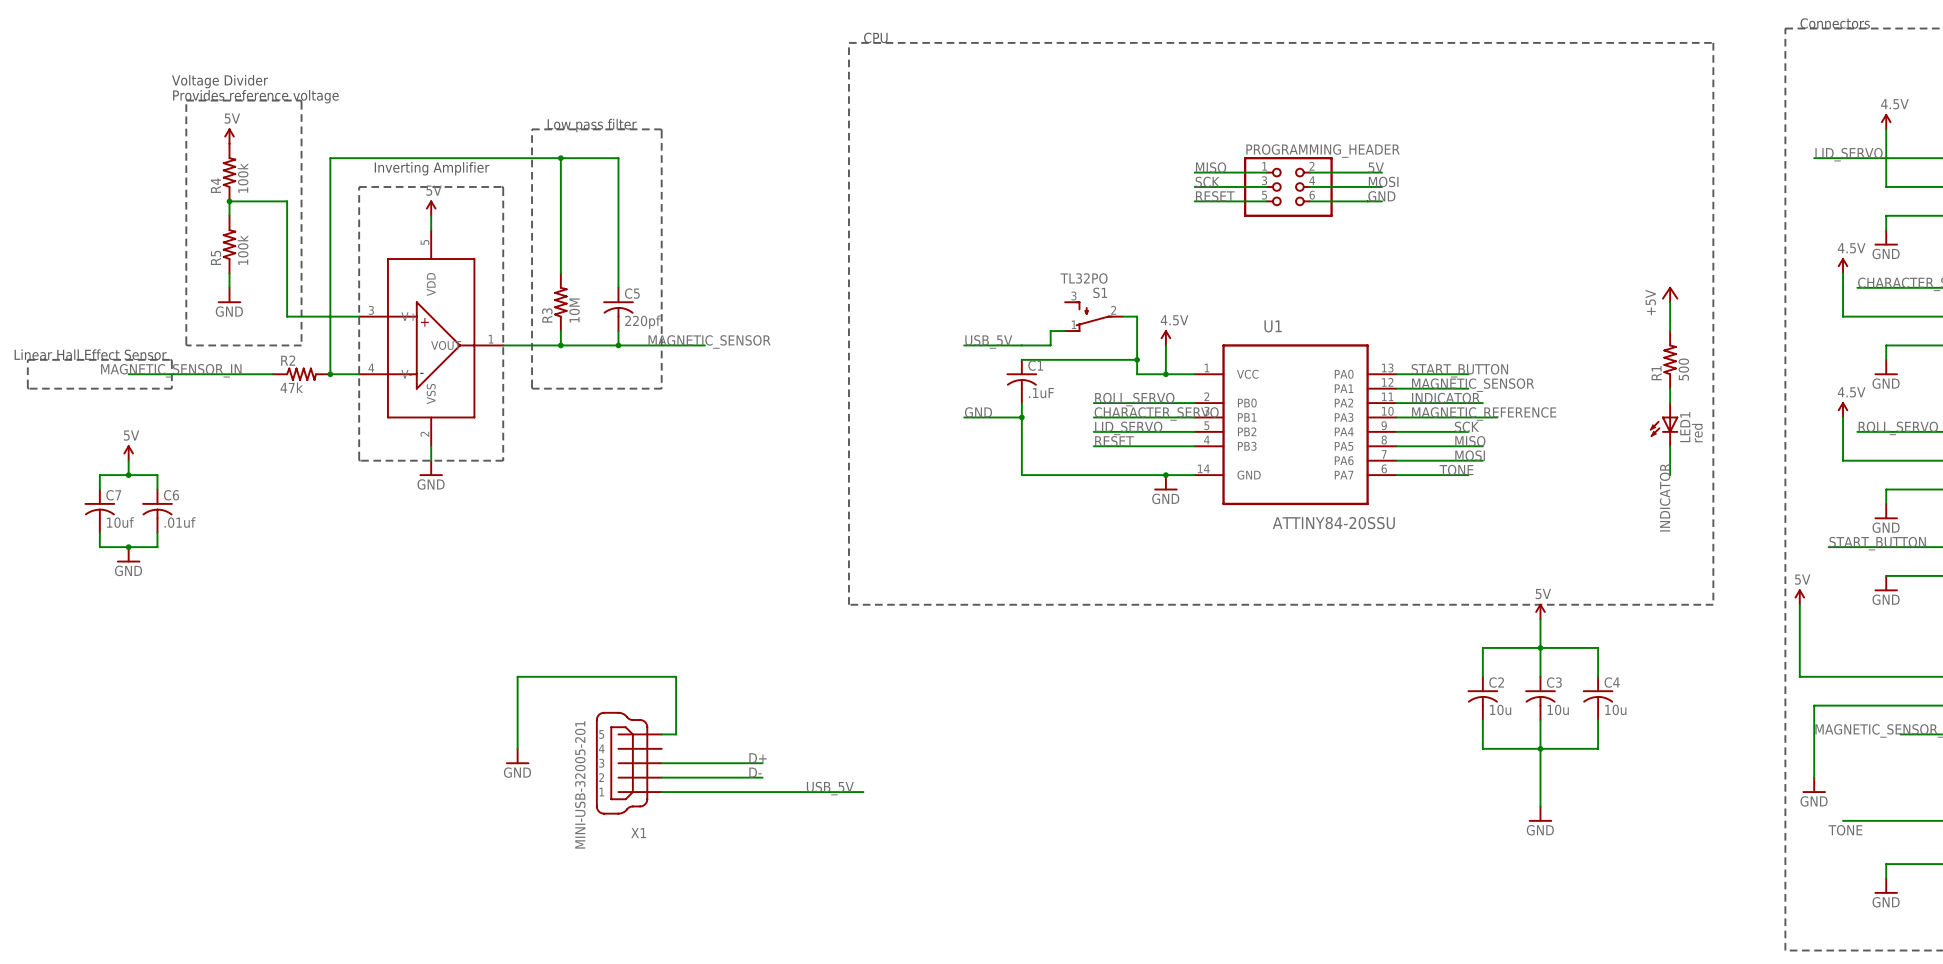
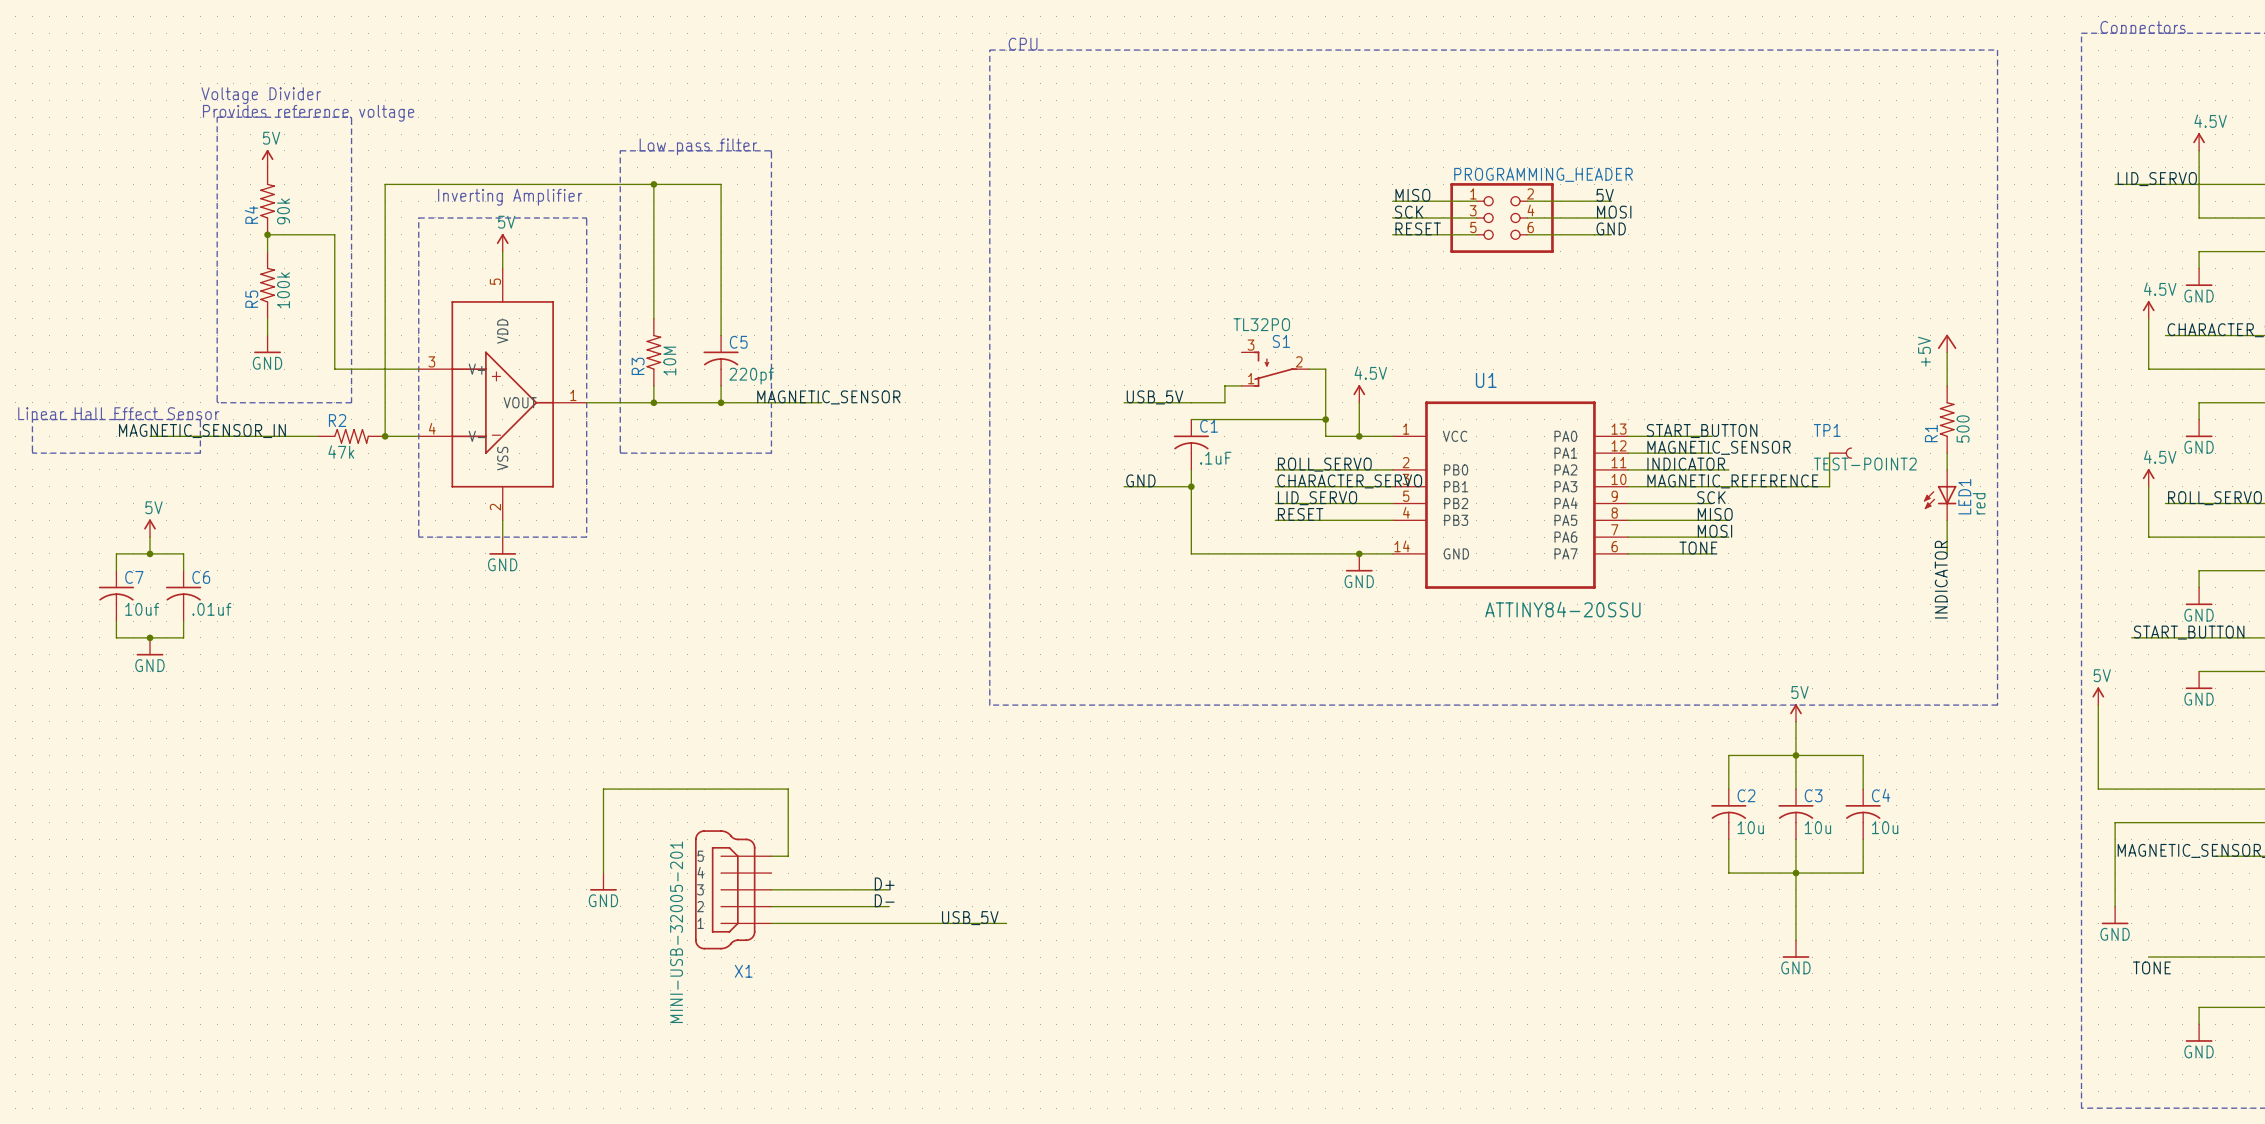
R4 value: 100k (243, 178) -> 90k (283, 211)
wire: none -> (1829, 453) (1829, 486) (1745, 486)
TP1: none -> TEST-POINT2 (1840, 453)

